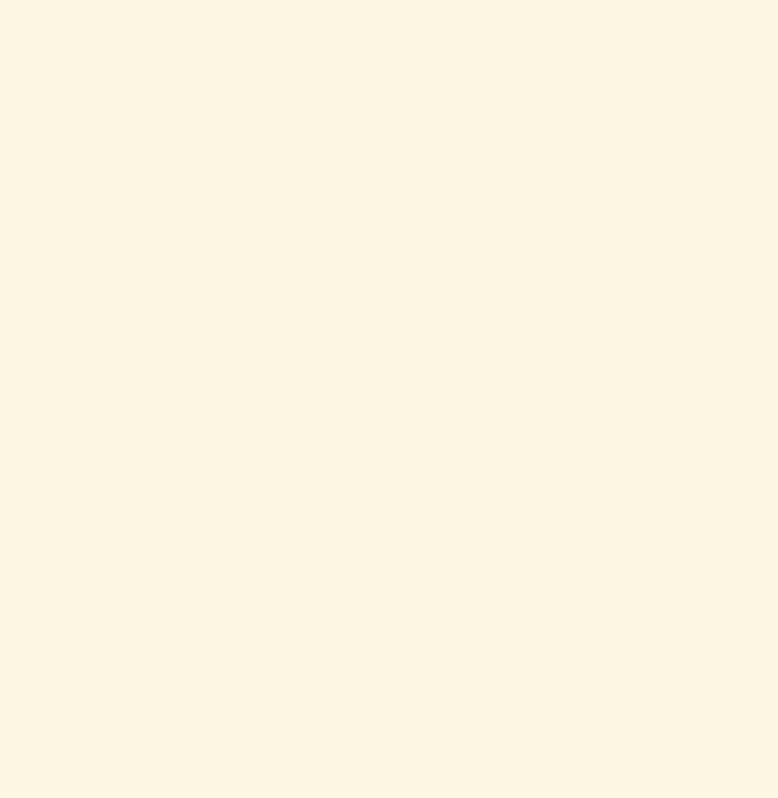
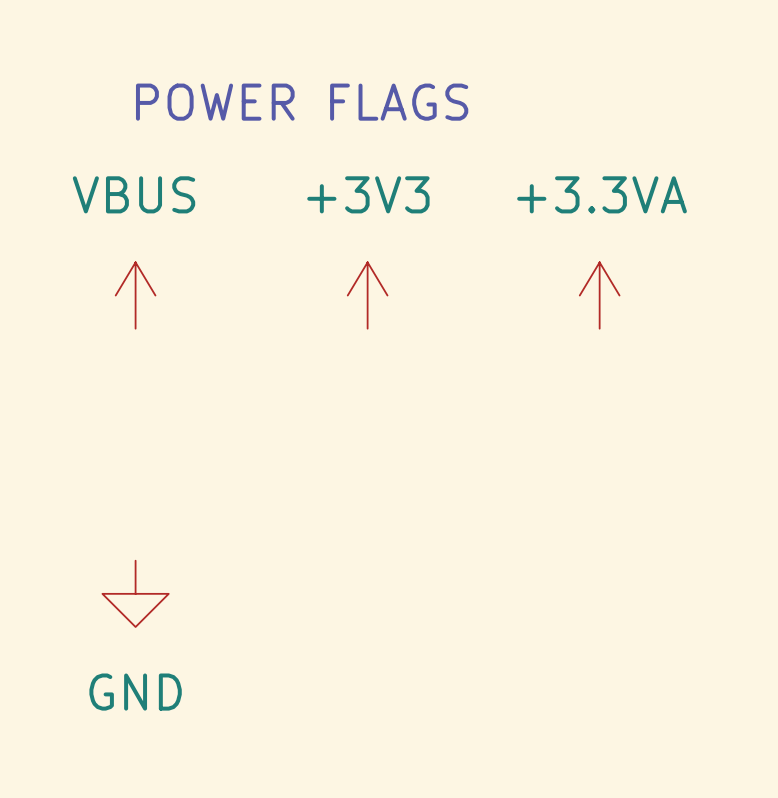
text: none -> POWER FLAGS (302, 102)
power symbol: none -> VBUS (135, 295)
power symbol: none -> +3V3 (367, 295)
power symbol: none -> +3.3VA (599, 295)
power symbol: none -> GND (135, 593)

